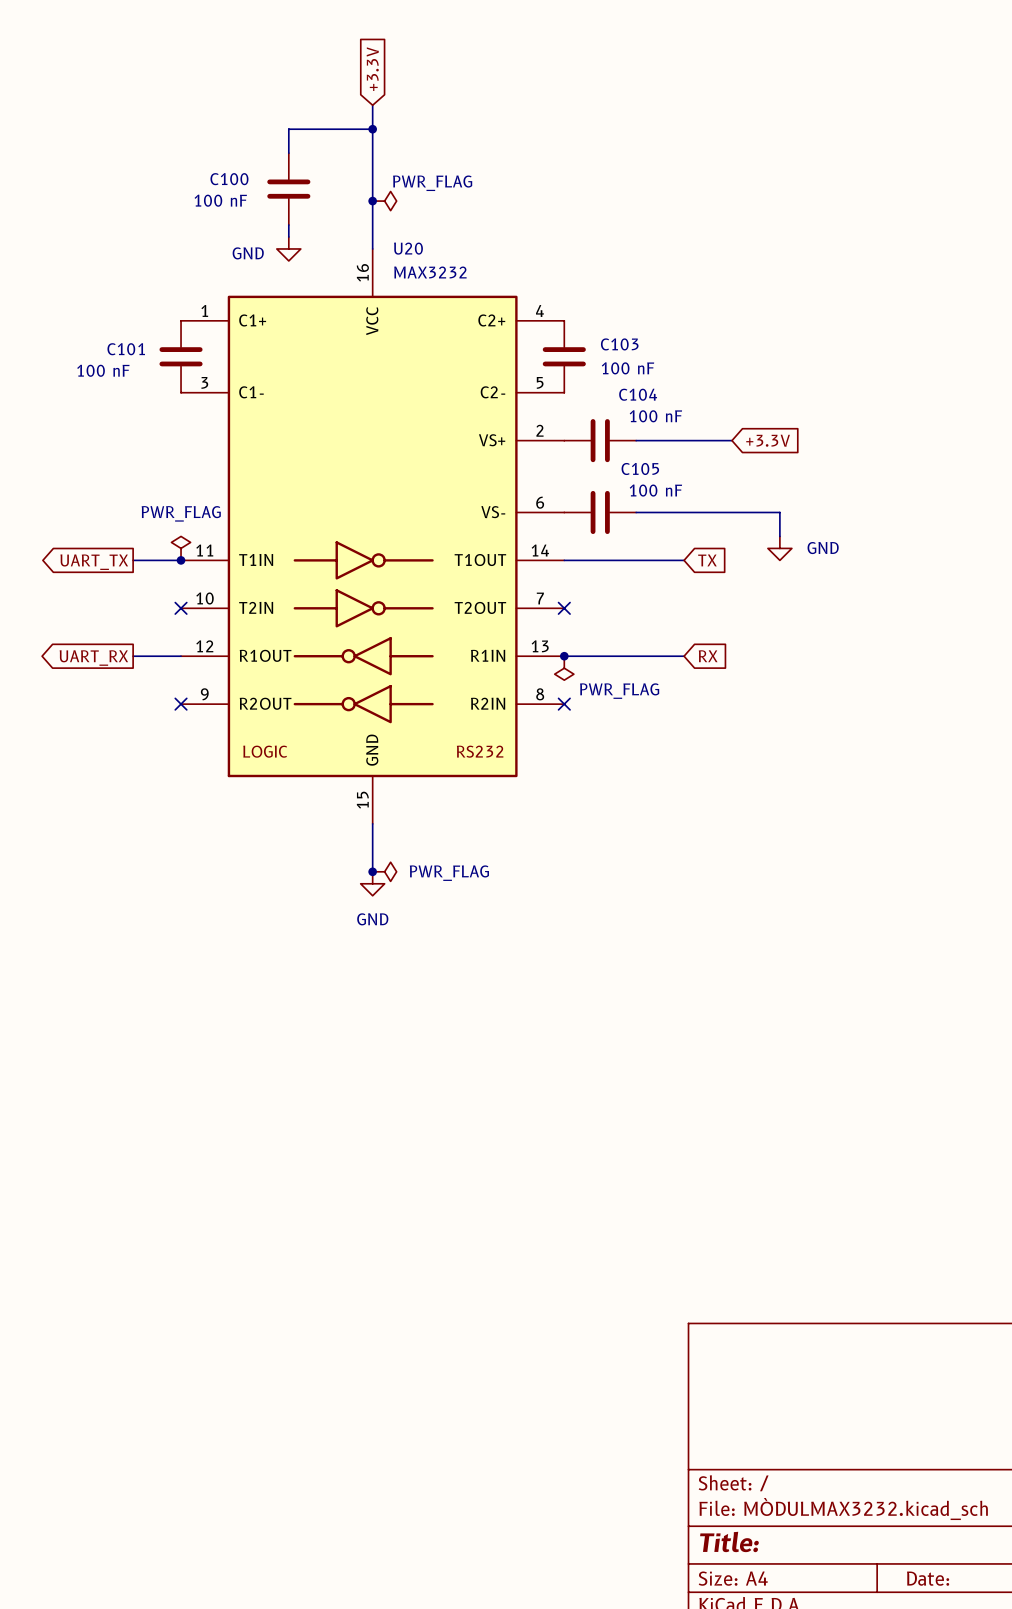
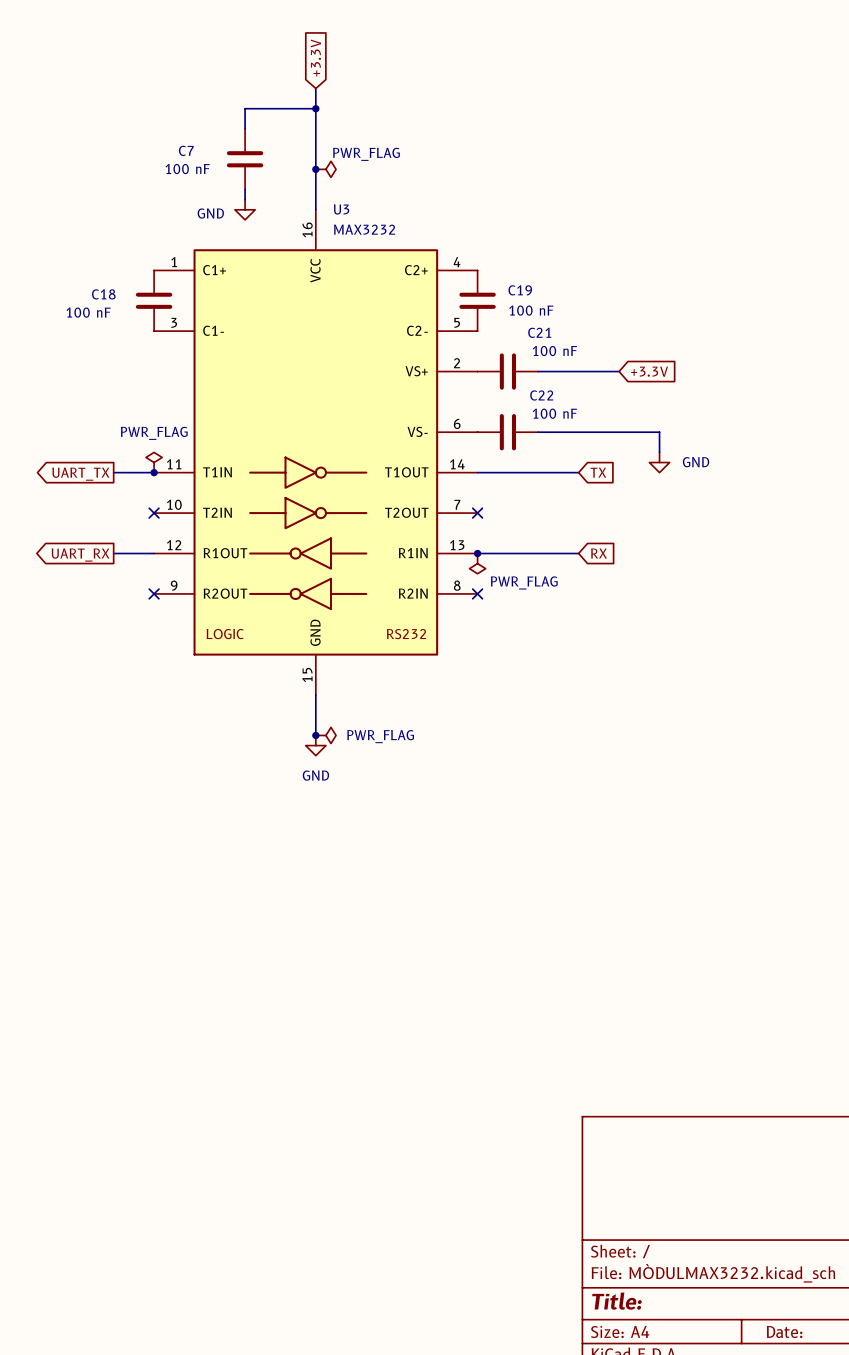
C100 name: C100 (229, 179) -> C7 (186, 150)
U20 name: U20 (408, 248) -> U3 (341, 209)
C103 name: C103 (619, 344) -> C19 (520, 290)
C101 name: C101 (126, 349) -> C18 (103, 294)
C104 name: C104 (638, 394) -> C21 (539, 332)
C105 name: C105 (640, 468) -> C22 (541, 395)

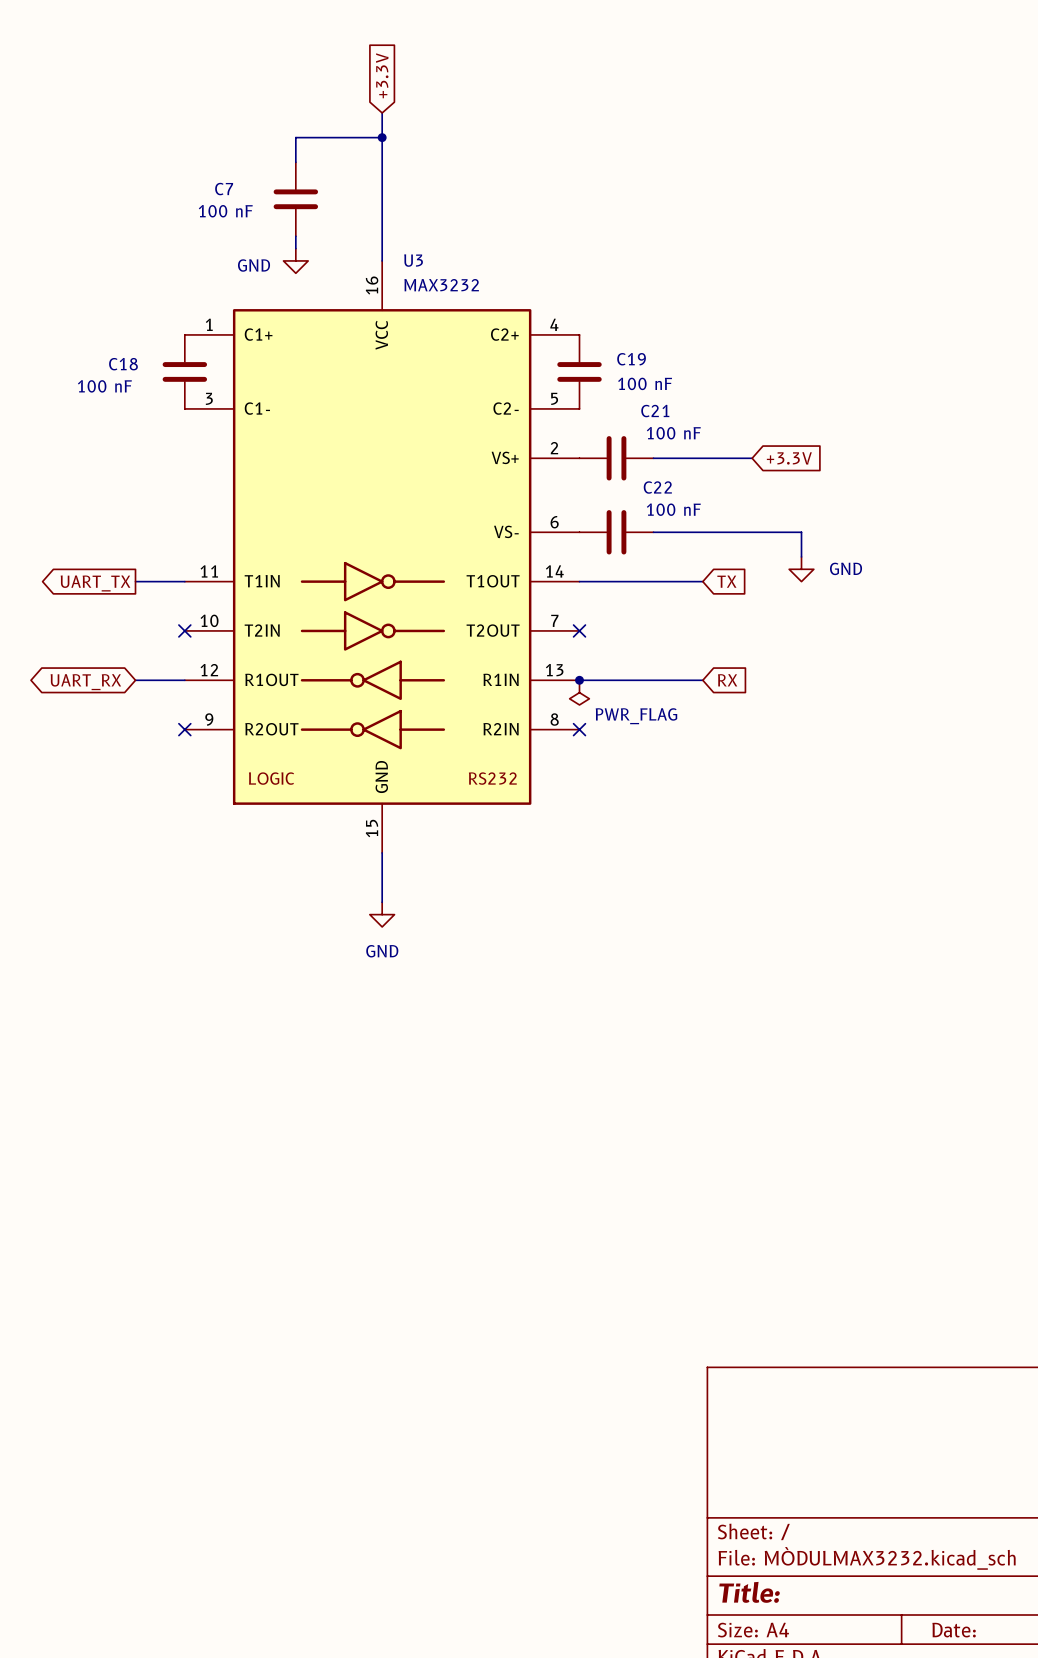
junction: (315, 169) -> none
power symbol: PWR_FLAG (325, 169) -> none
power symbol: PWR_FLAG (154, 462) -> none
junction: (154, 472) -> none
global label shape: output (80, 555) -> bidirectional (85, 682)
junction: (315, 735) -> none
power symbol: PWR_FLAG (325, 735) -> none

